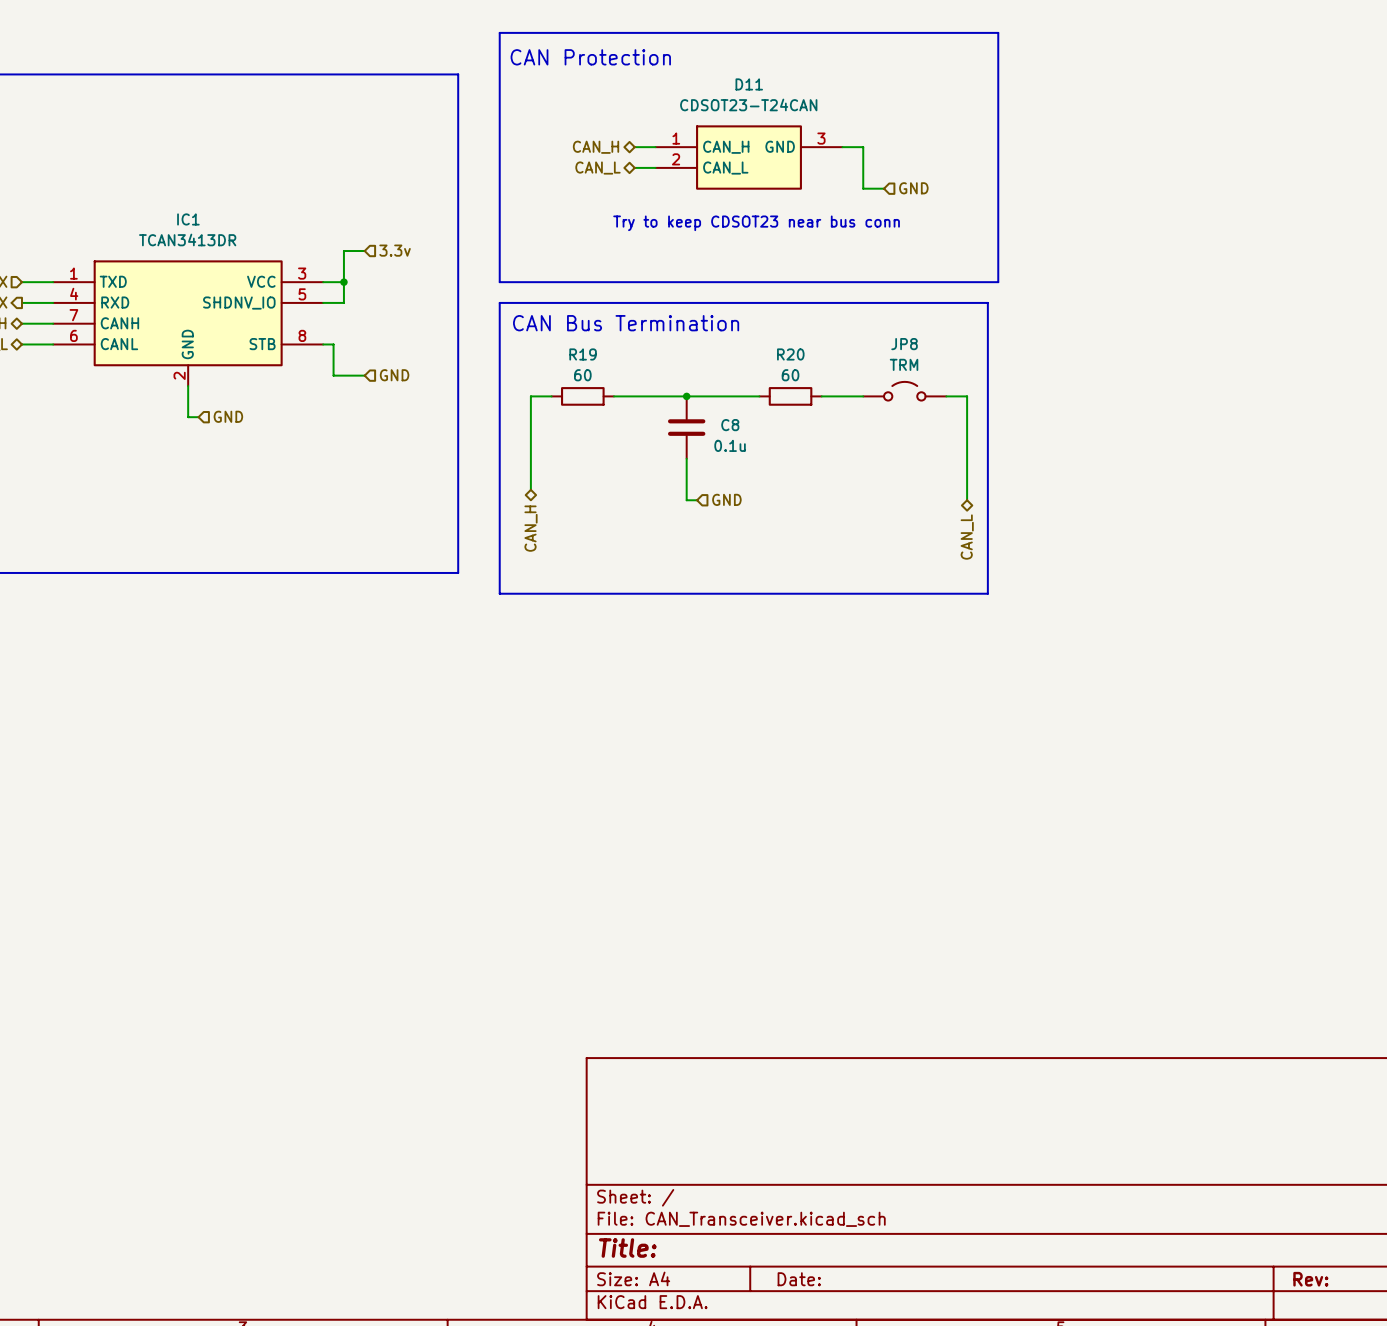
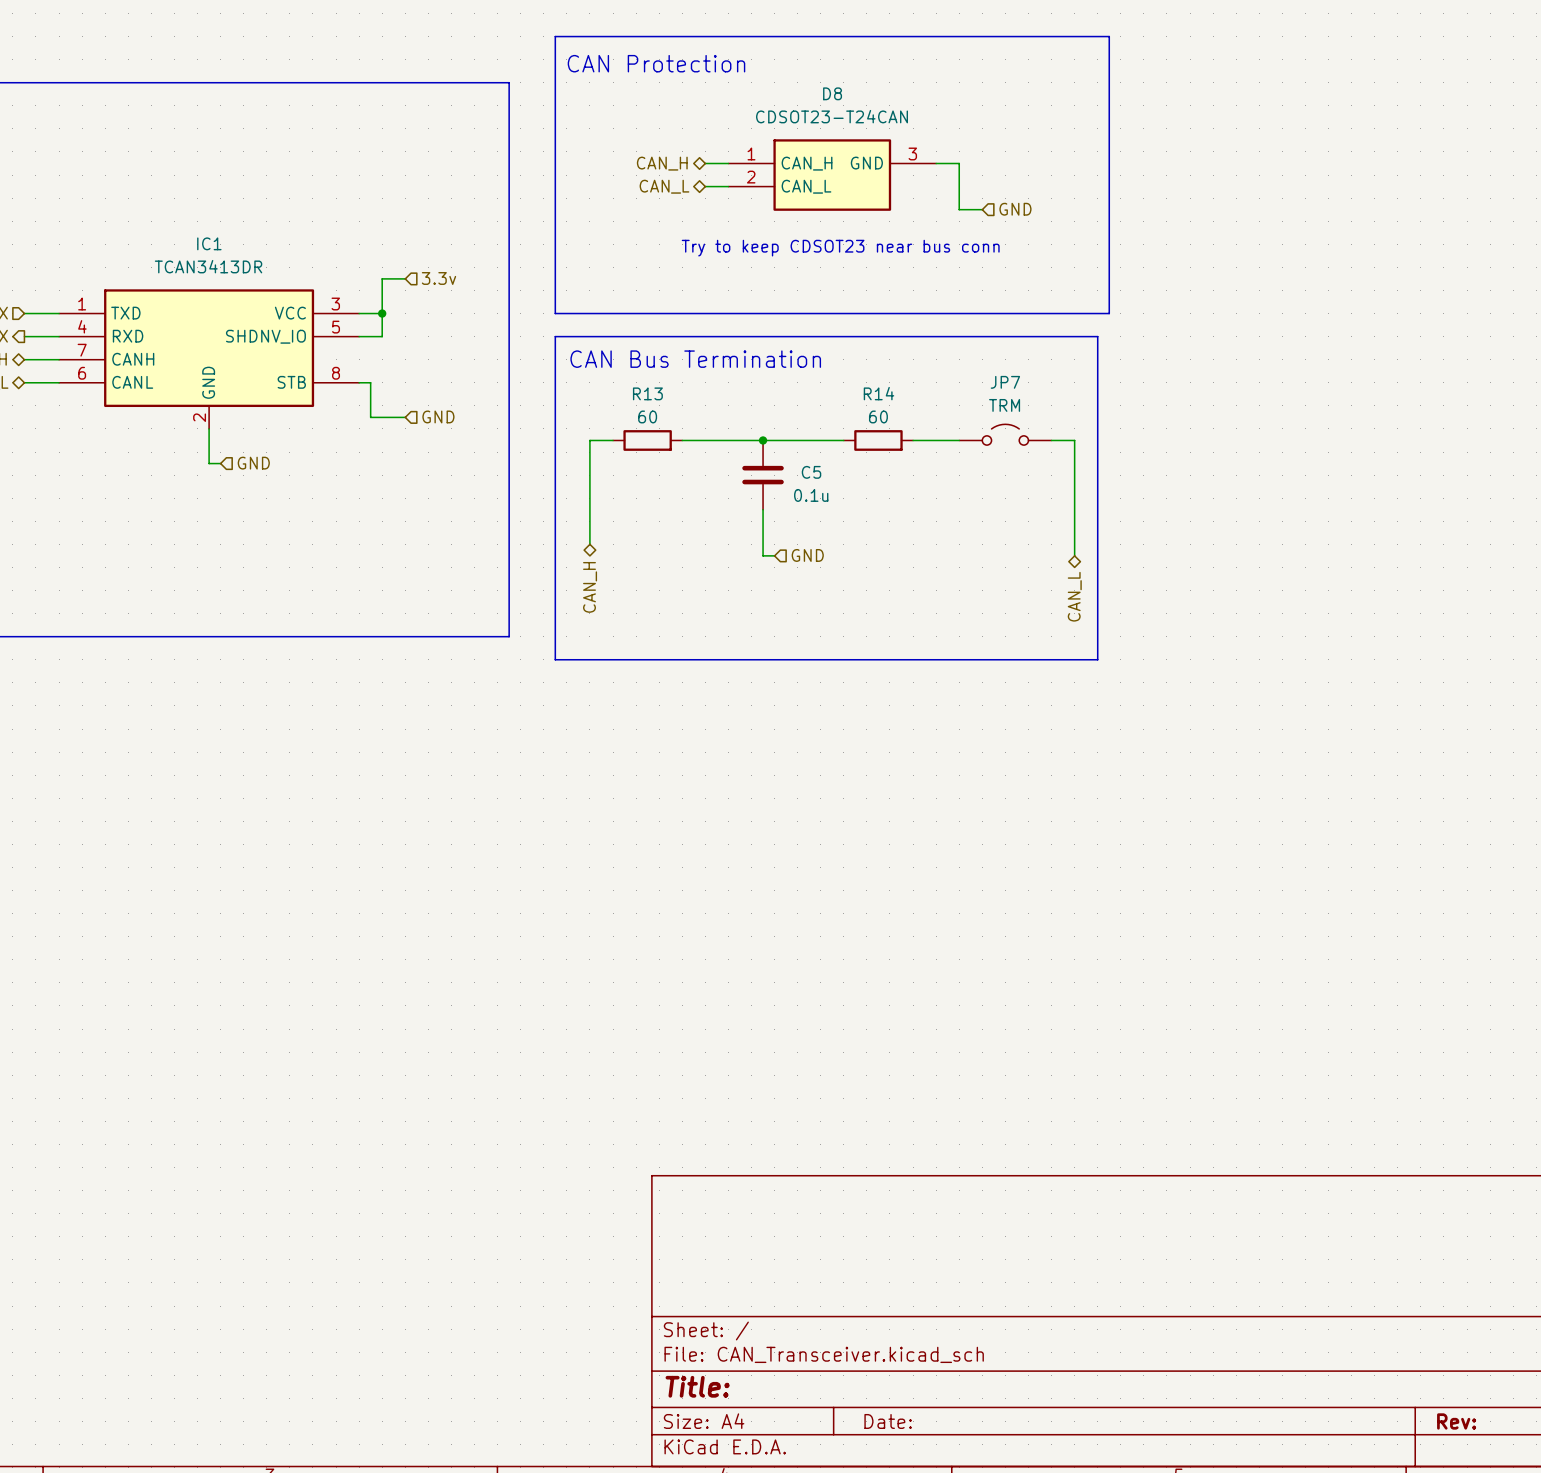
D11 name: D11 (749, 84) -> D8 (832, 93)
JP8 name: JP8 (904, 344) -> JP7 (1005, 382)
R19 name: R19 (583, 354) -> R13 (647, 393)
R20 name: R20 (790, 354) -> R14 (878, 393)
C8 name: C8 (730, 425) -> C5 (811, 472)

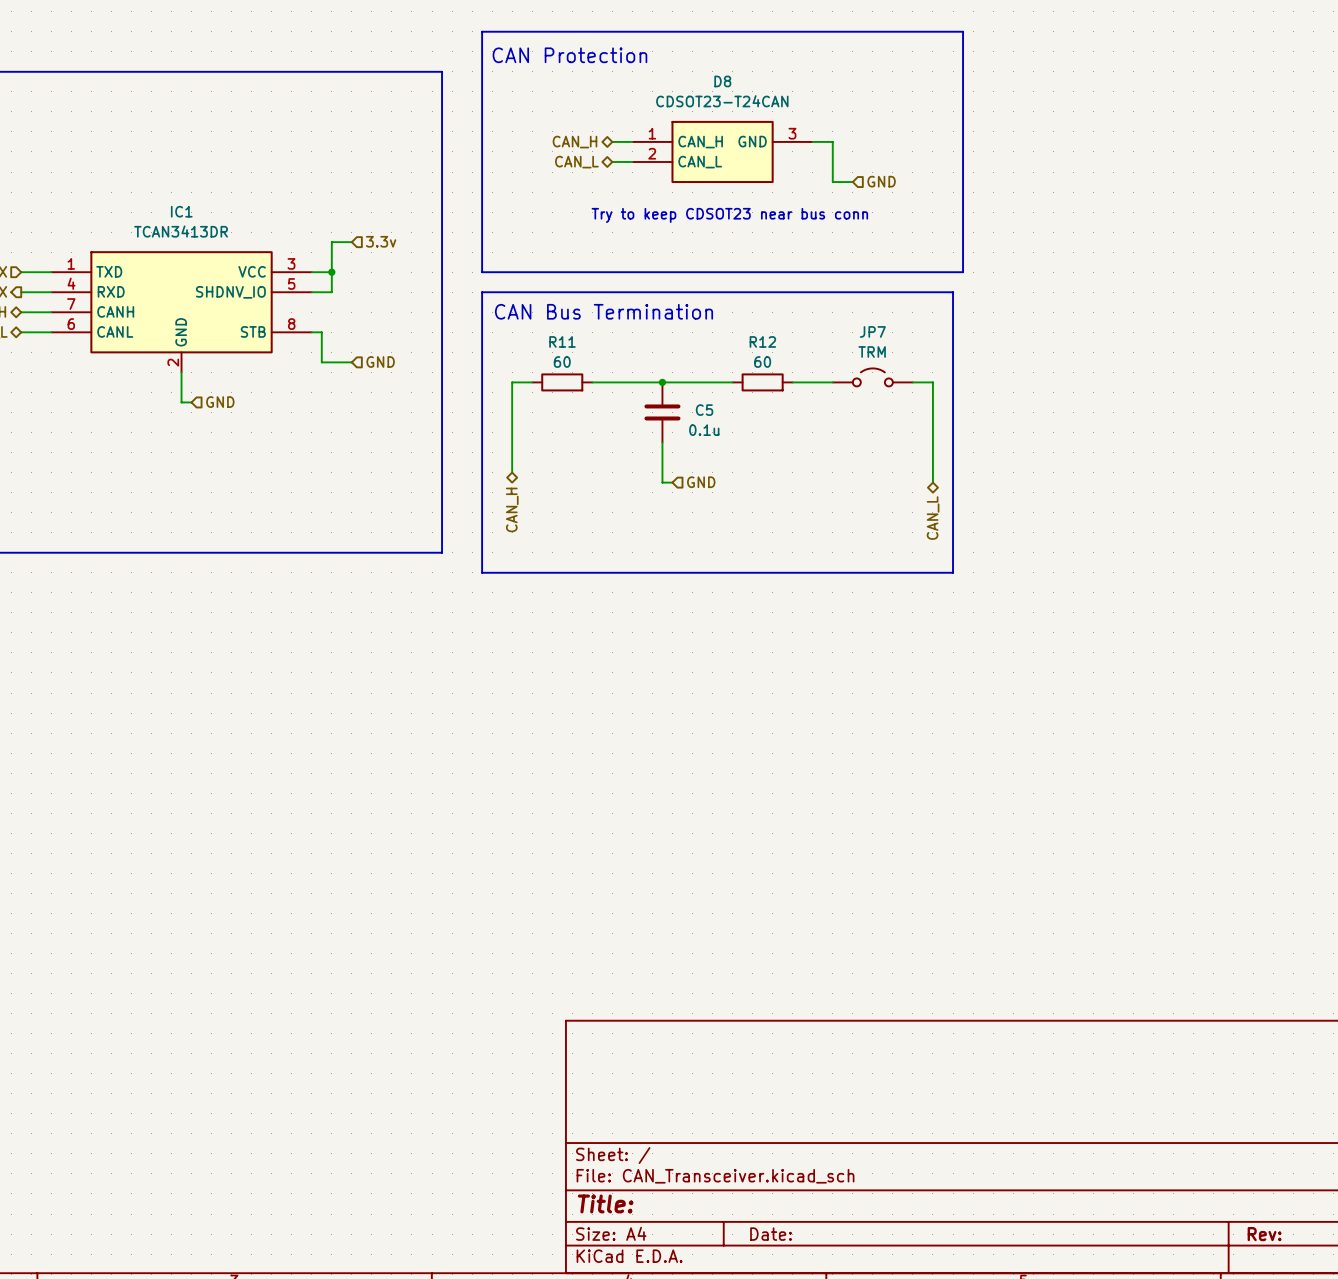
R13 name: R13 (647, 393) -> R11 (562, 341)
R14 name: R14 (878, 393) -> R12 (762, 341)

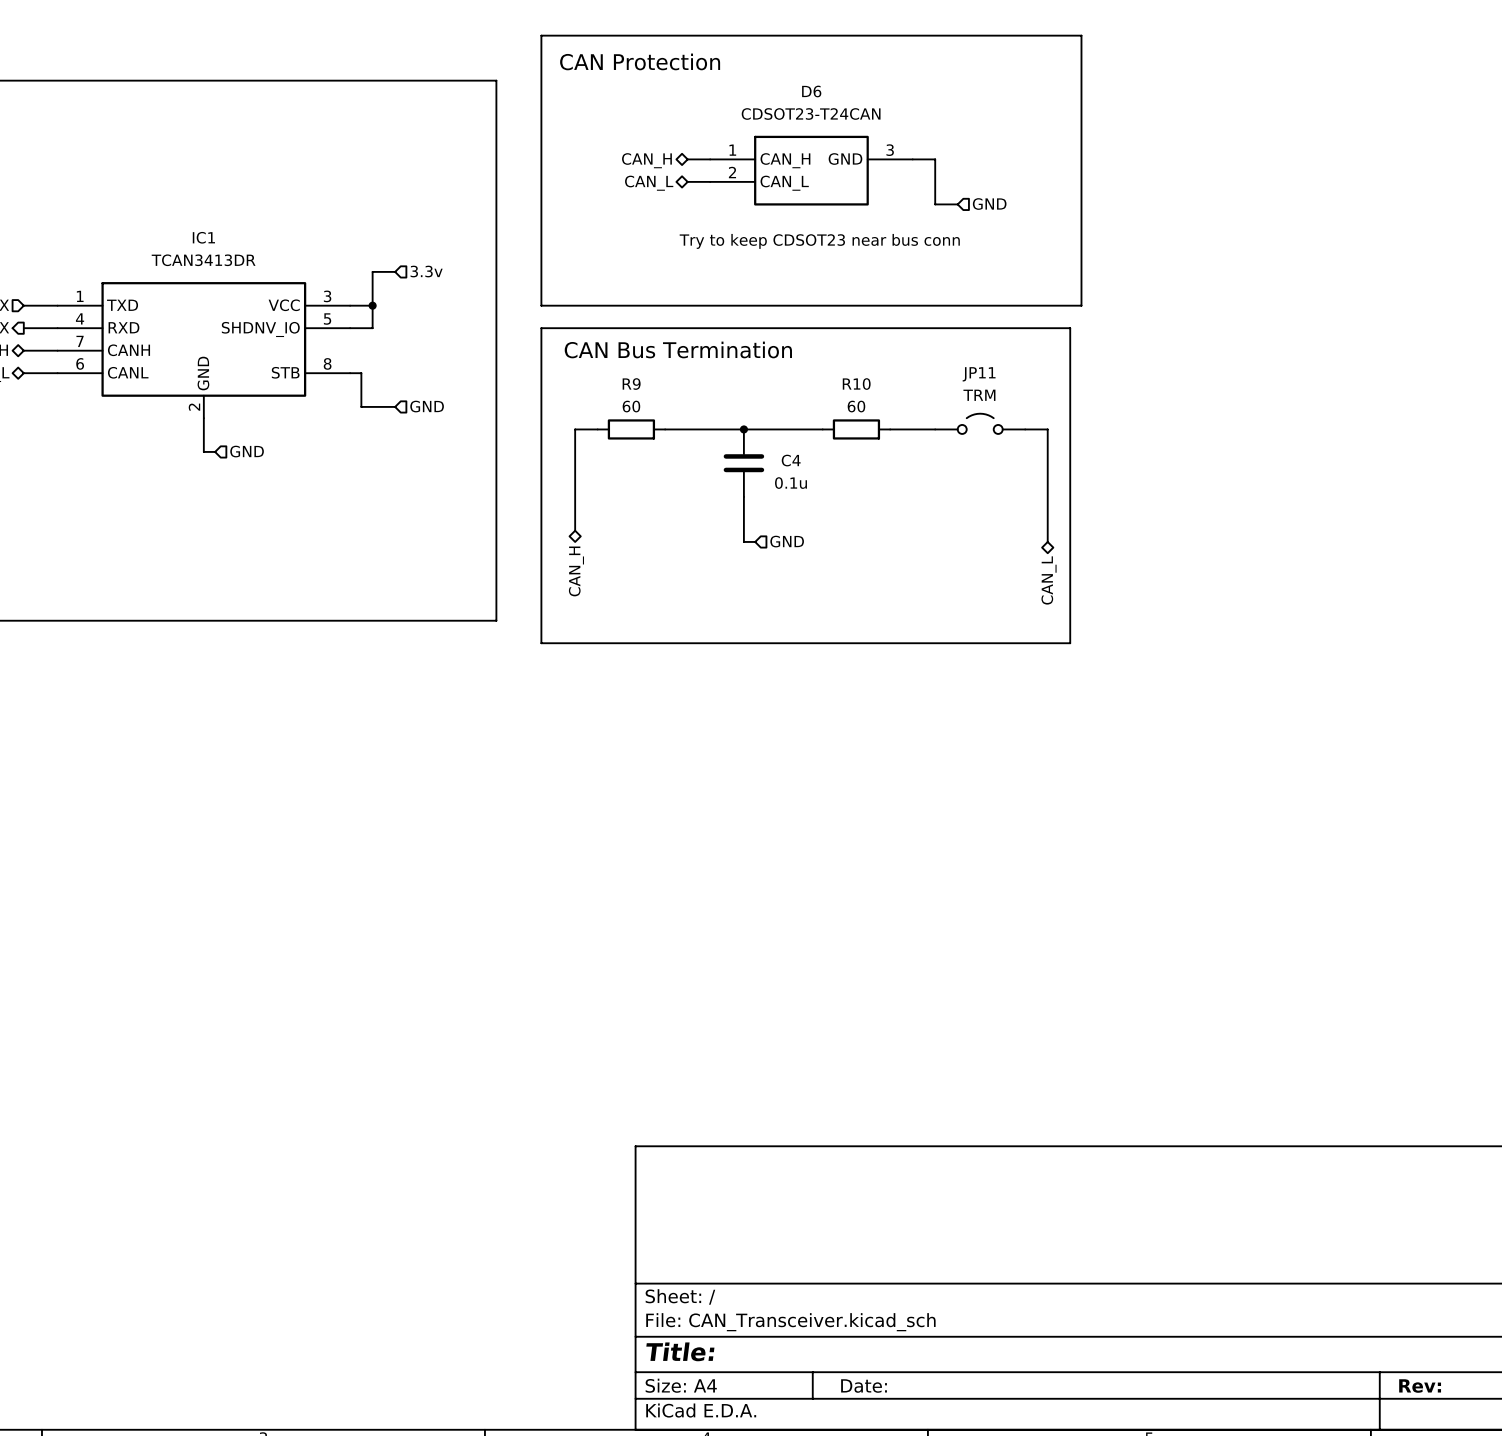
D8 name: D8 (722, 81) -> D6 (811, 91)
JP7 name: JP7 (872, 331) -> JP11 (979, 374)
R11 name: R11 (562, 341) -> R9 (631, 384)
R12 name: R12 (762, 341) -> R10 (856, 384)
C5 name: C5 (704, 410) -> C4 (791, 460)

